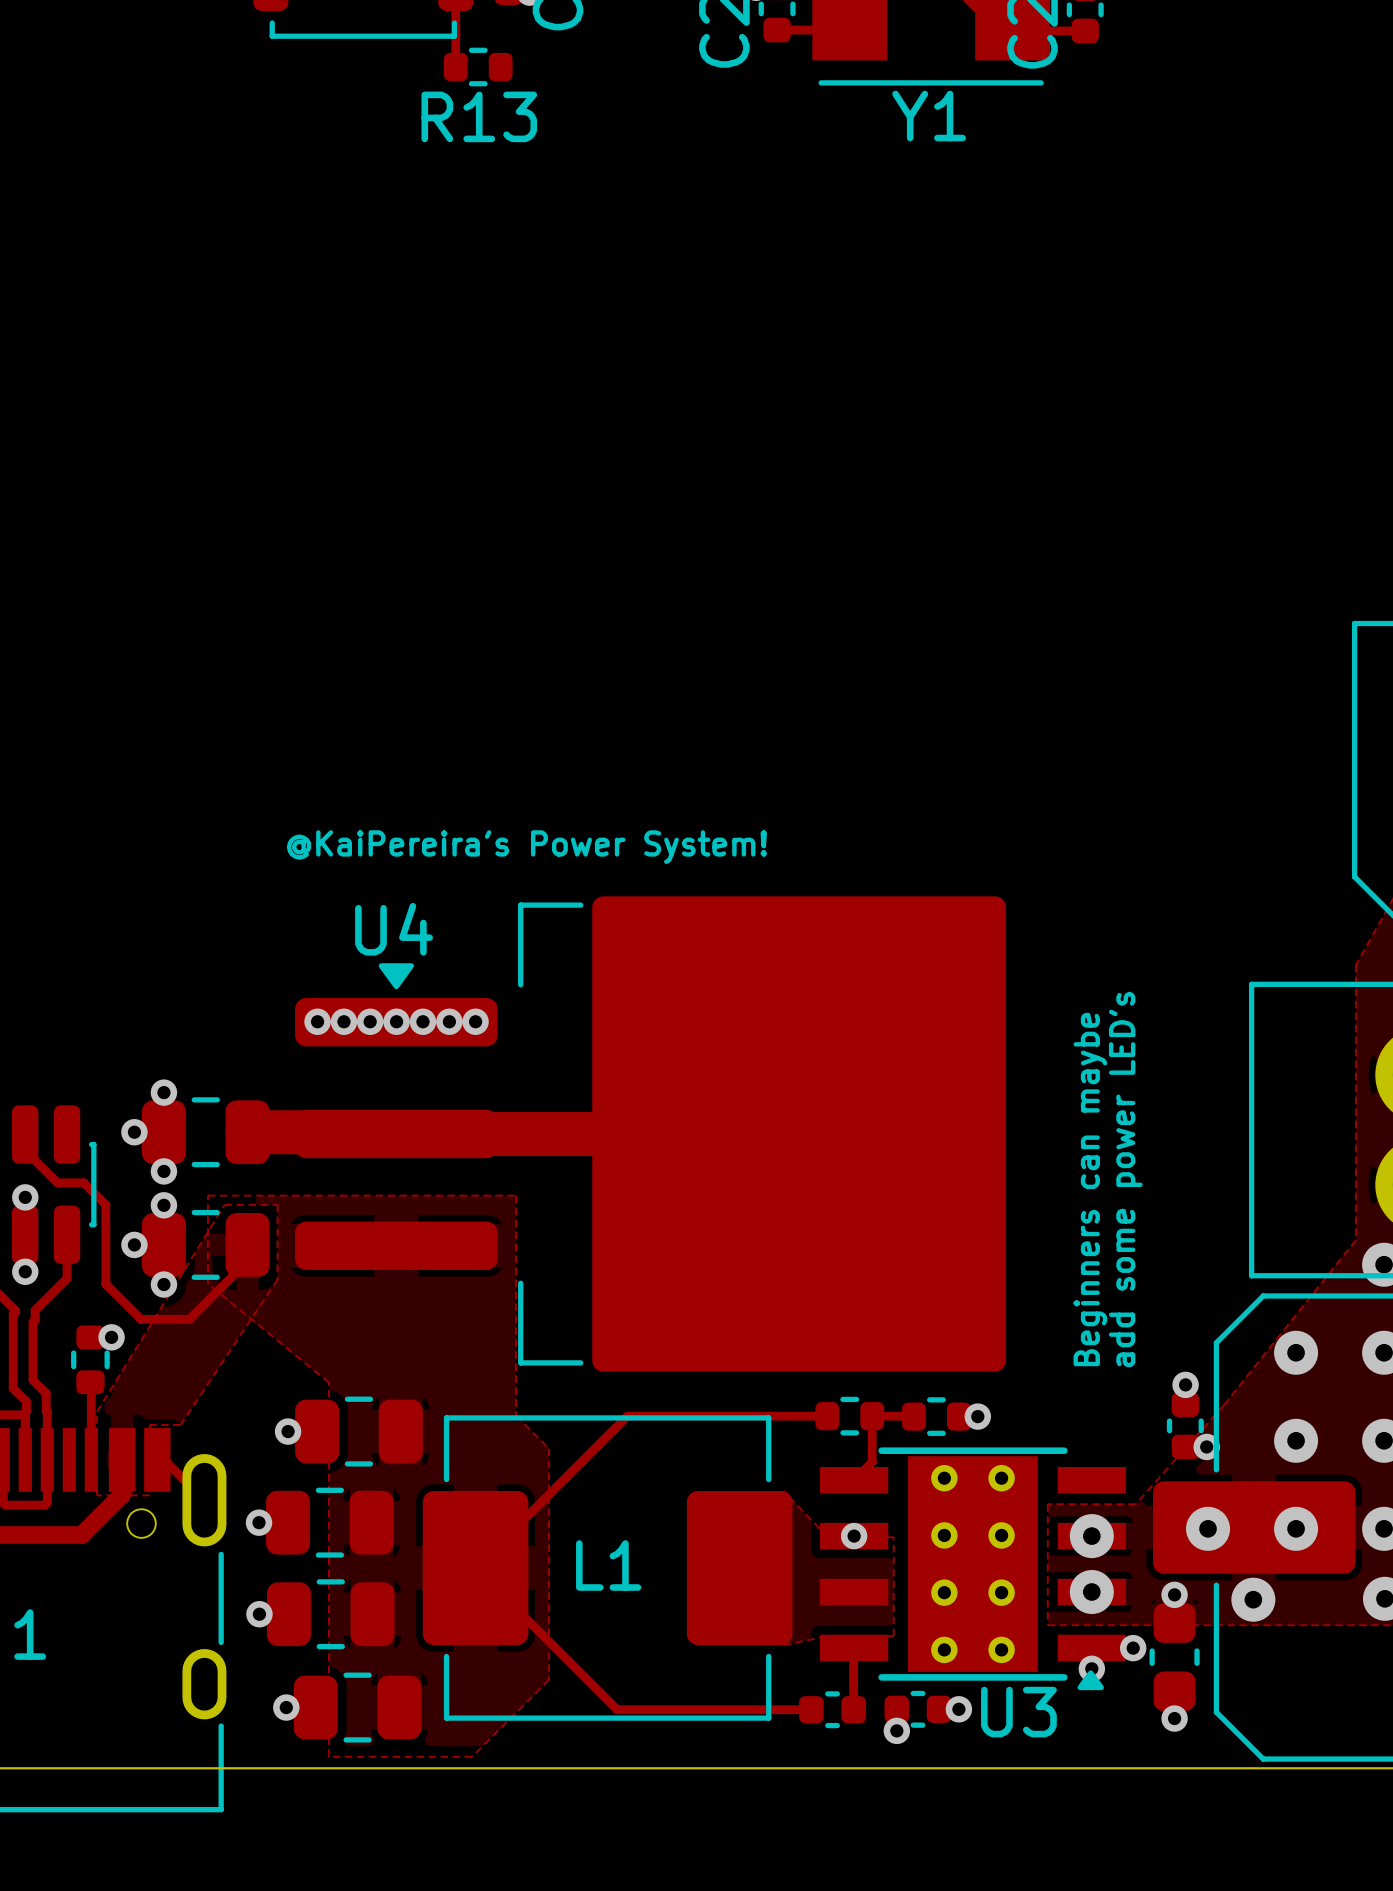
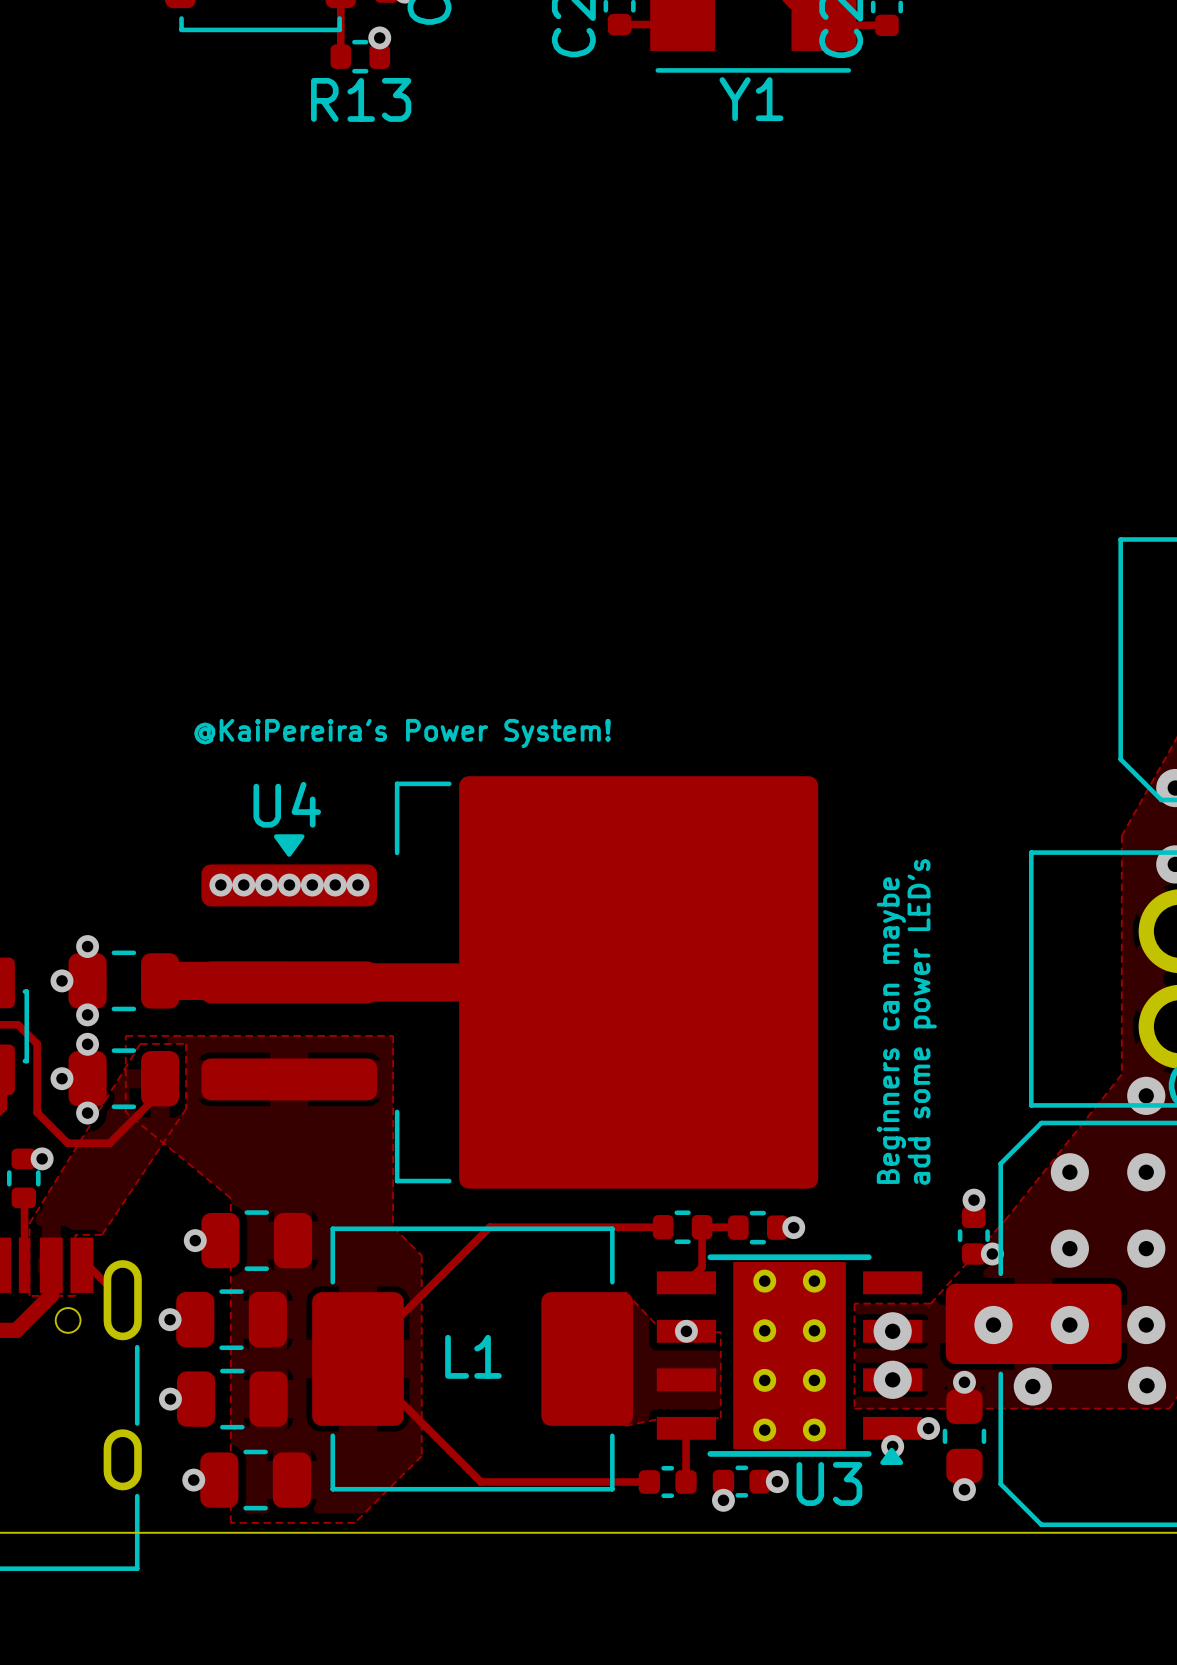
via: none -> (379, 37)

